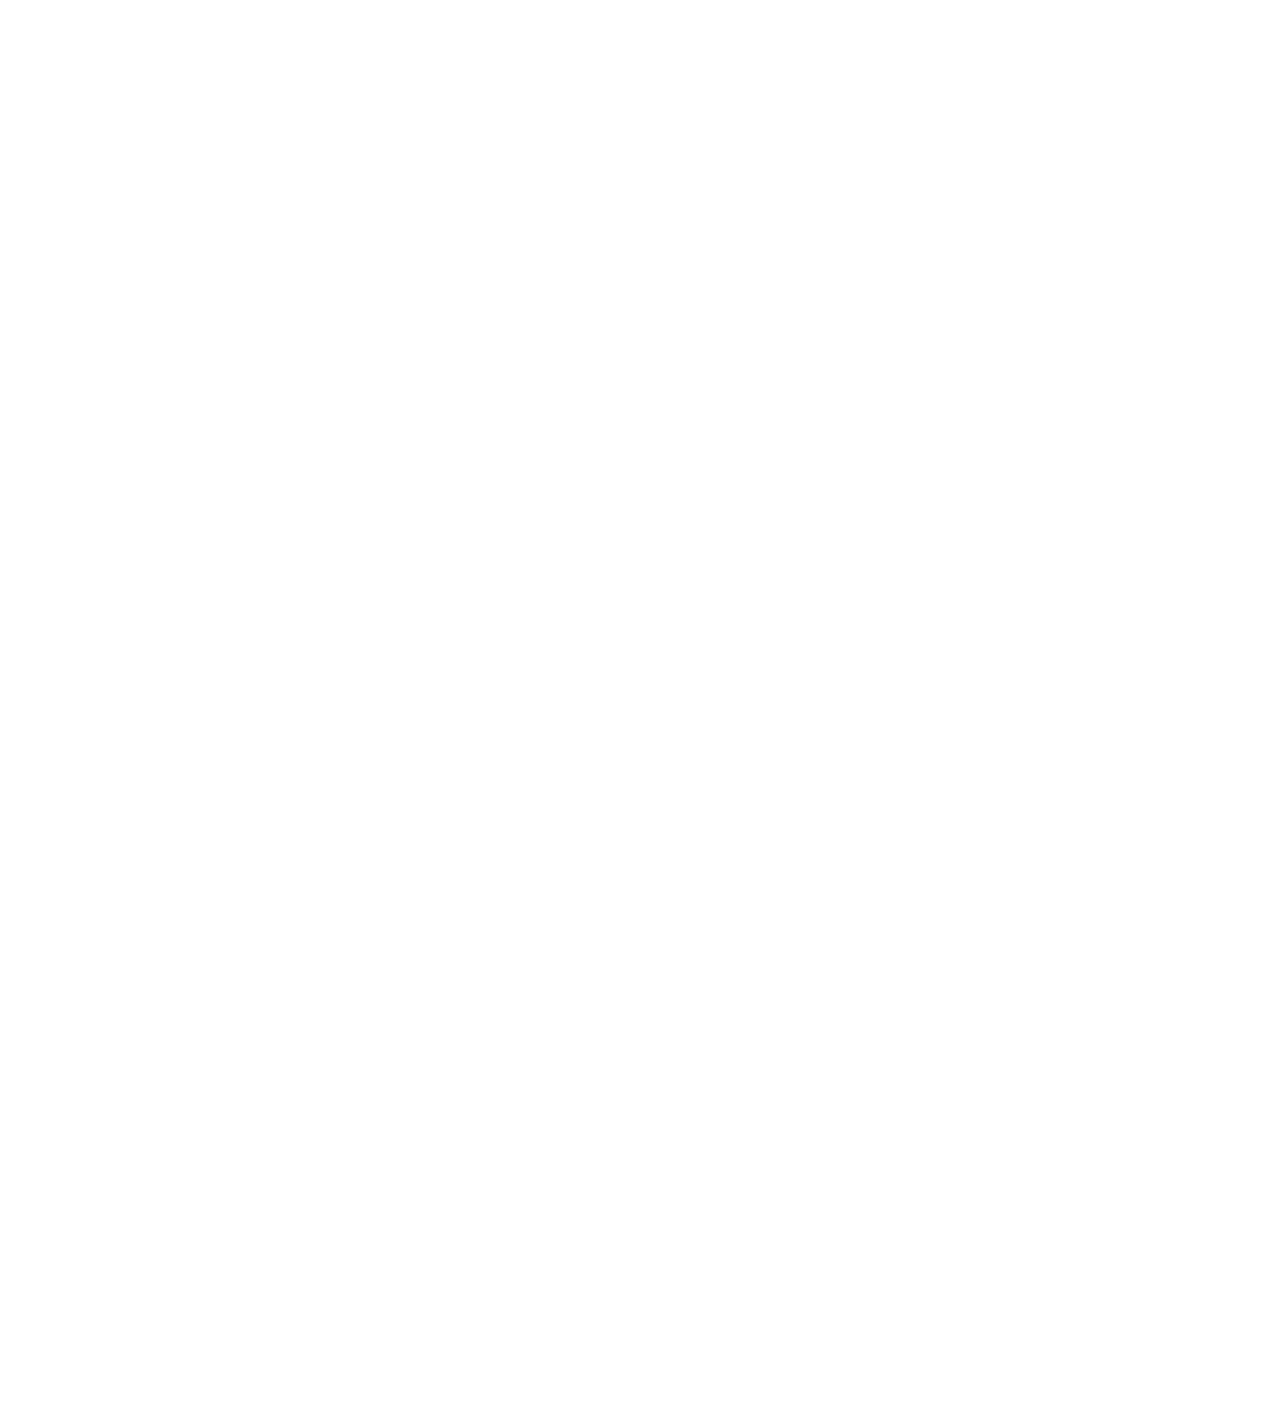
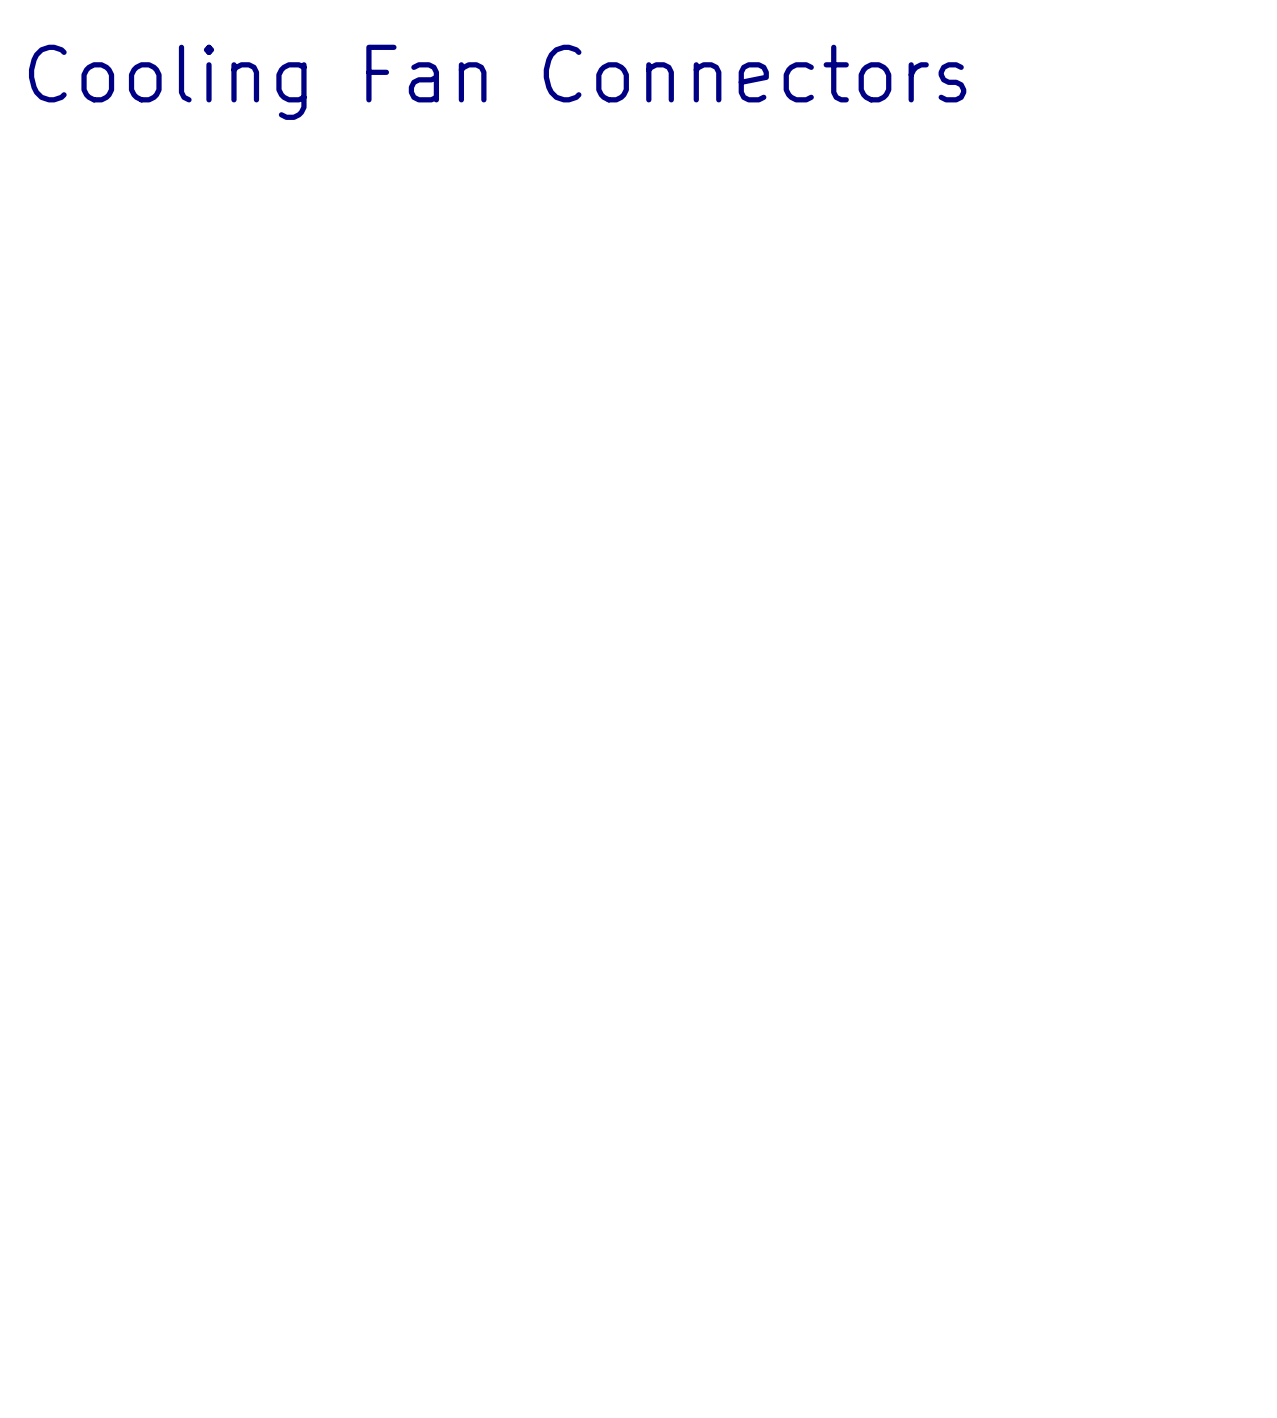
text: none -> Cooling Fan Connectors (497, 82)

